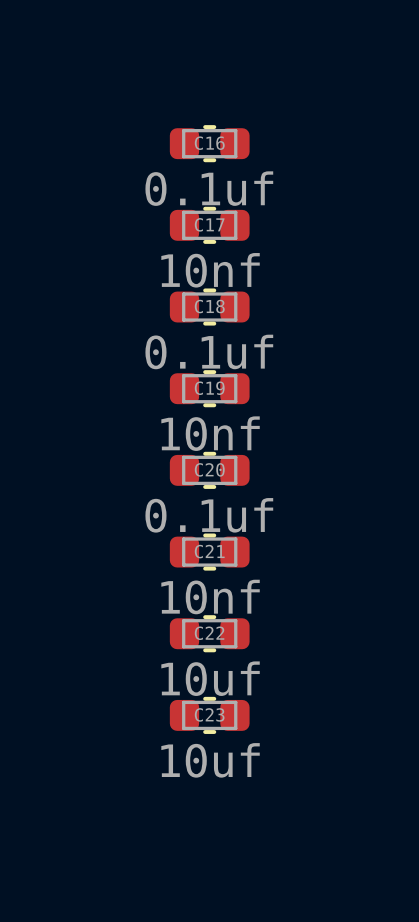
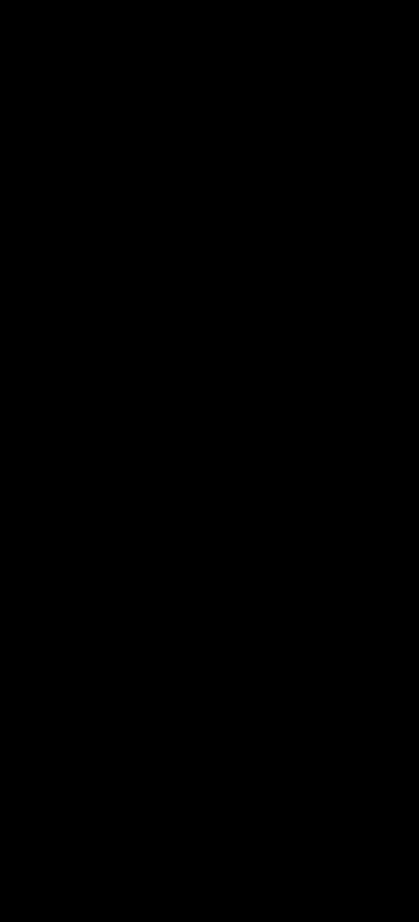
C16: 0.1uf (209, 143) -> none
C17: 10nf (209, 225) -> none
C18: 0.1uf (209, 307) -> none
C19: 10nf (209, 388) -> none
C20: 0.1uf (209, 470) -> none
C21: 10nf (209, 552) -> none
C22: 10uf (209, 633) -> none
C23: 10uf (209, 715) -> none

